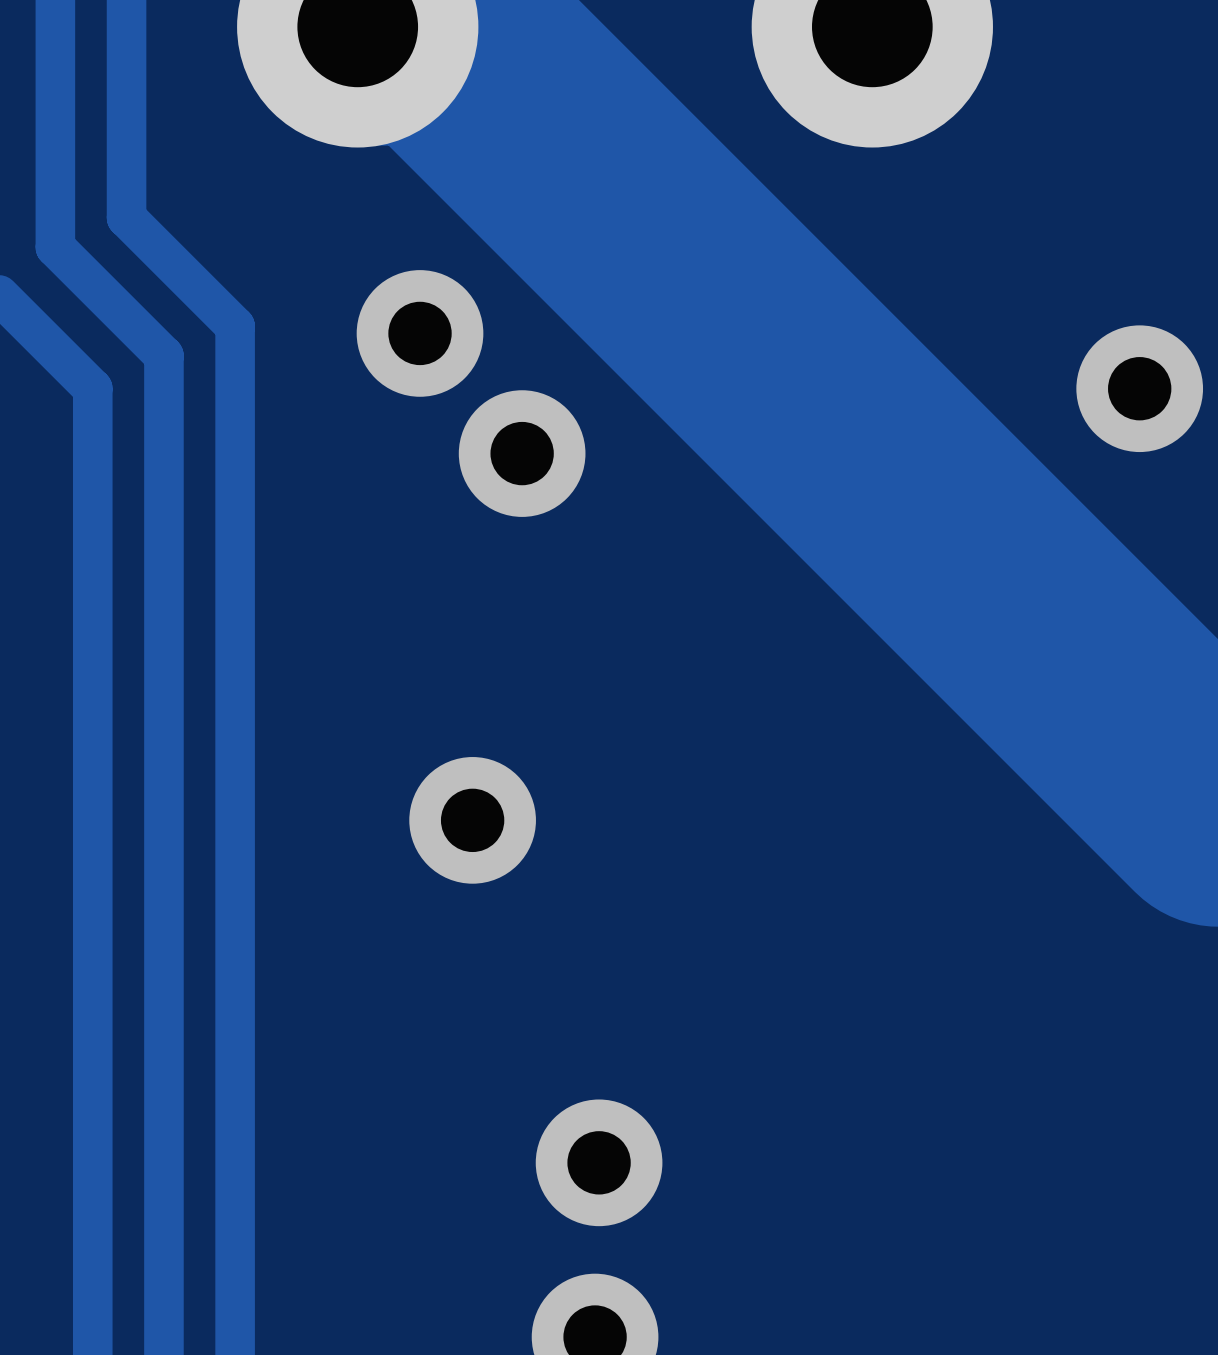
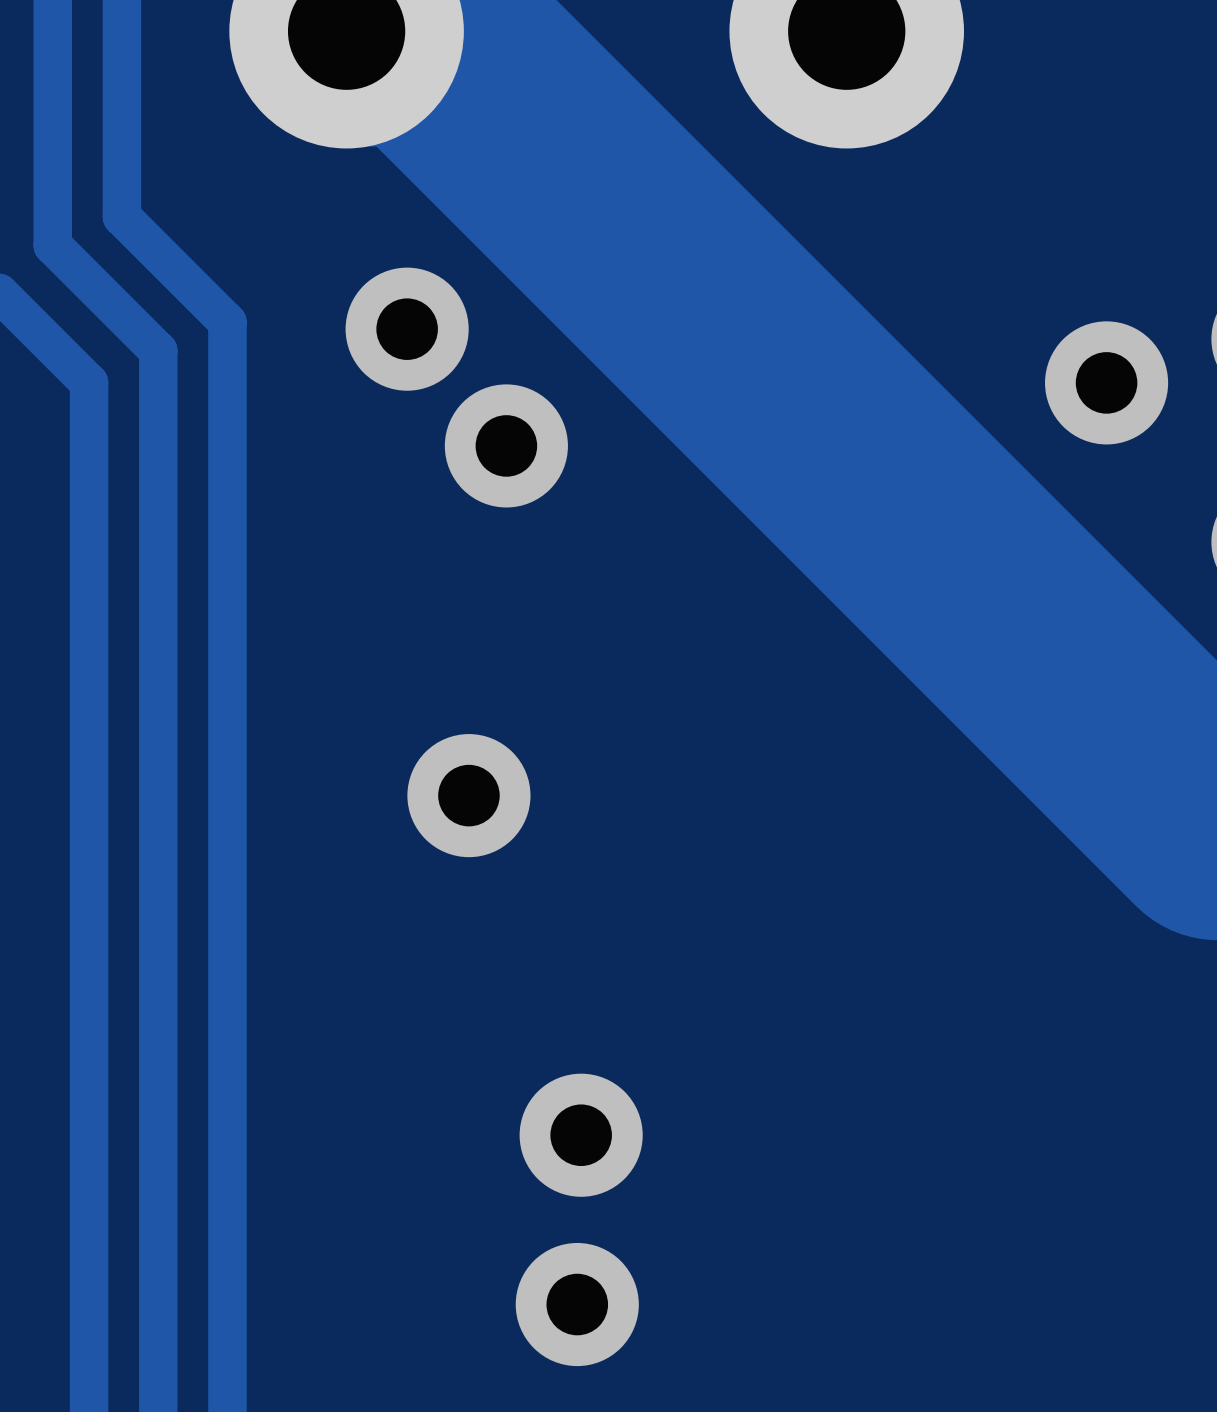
via position: (472, 820) -> (468, 795)

